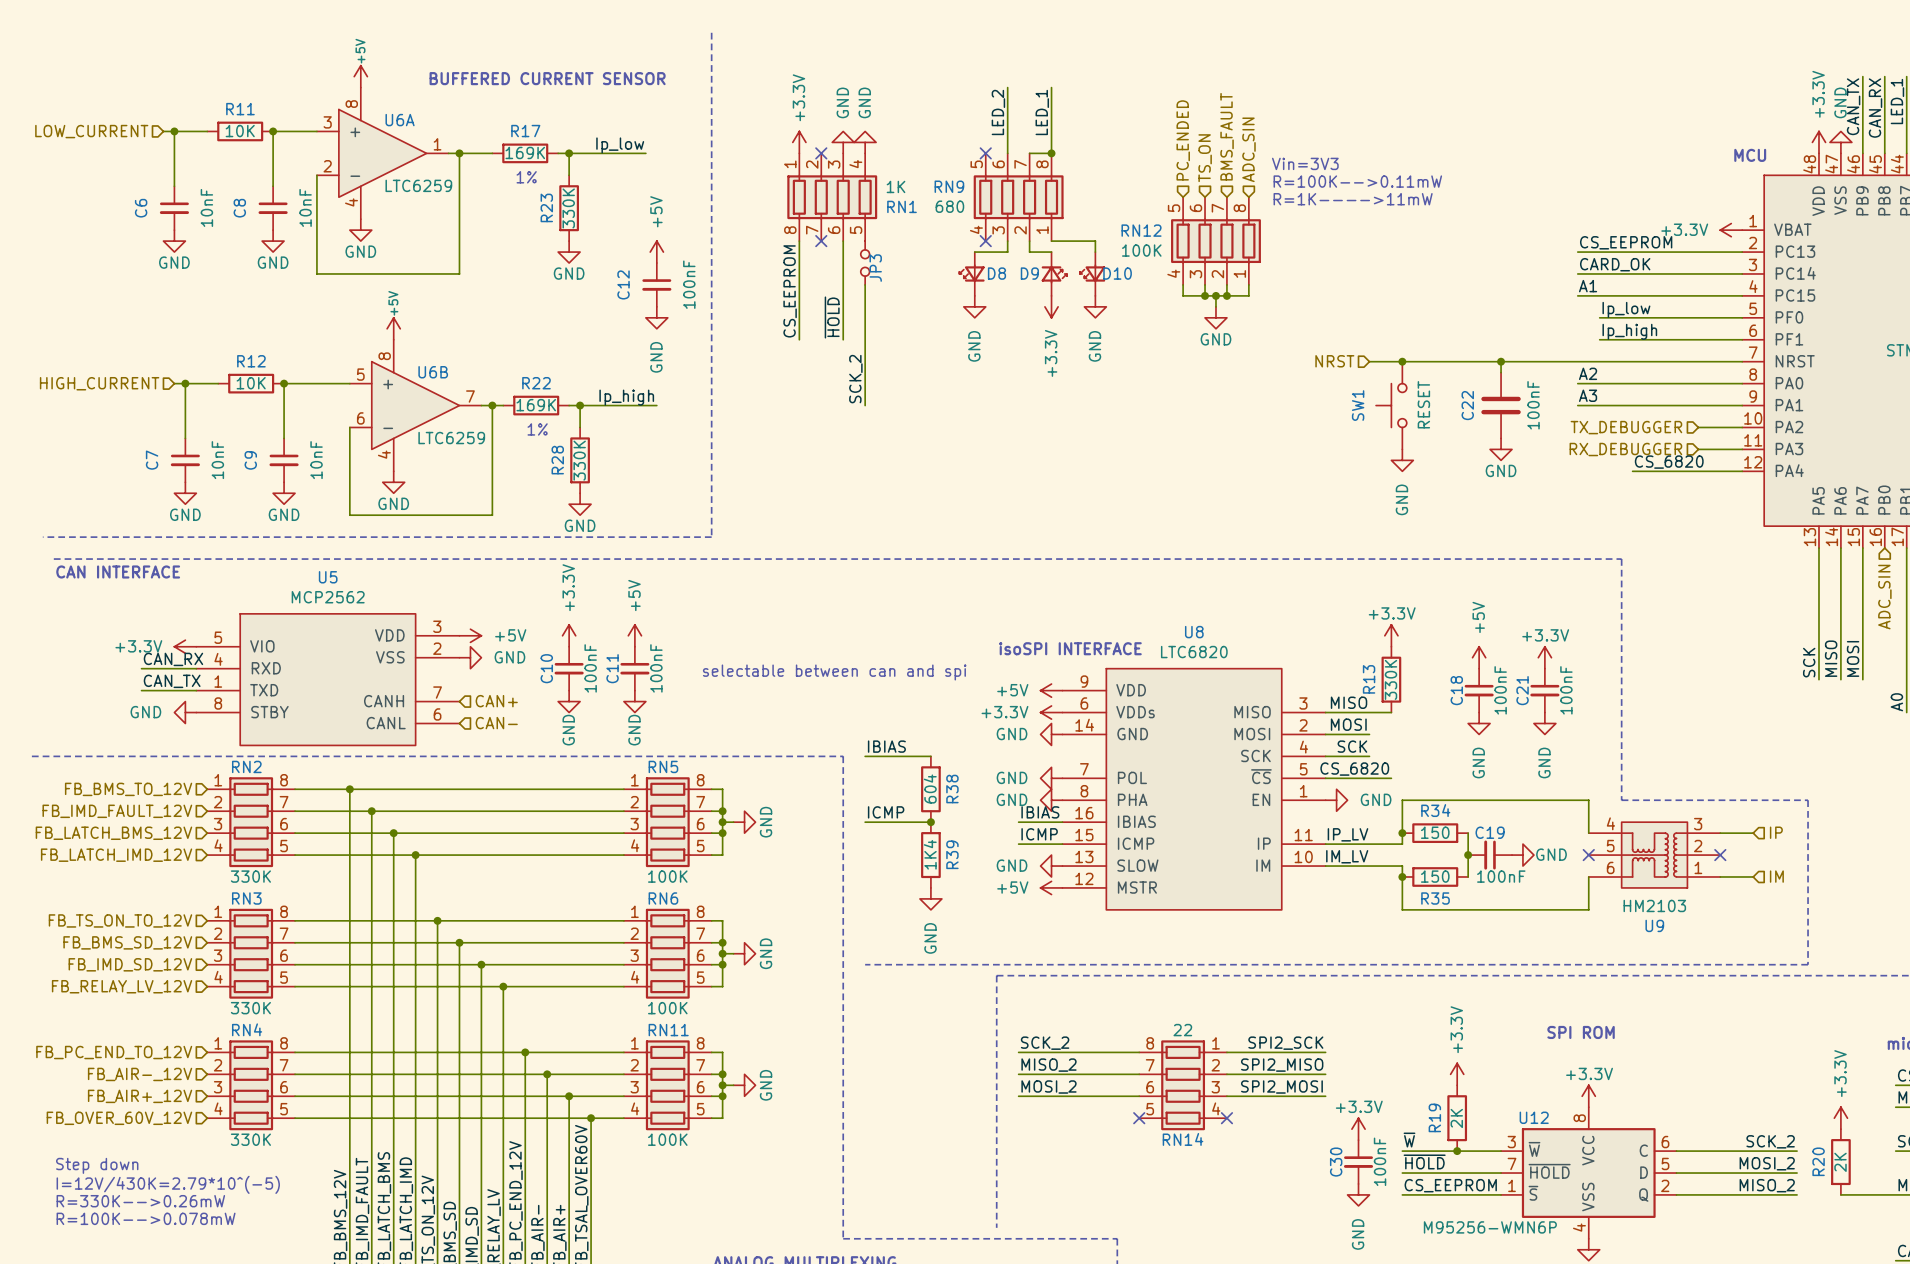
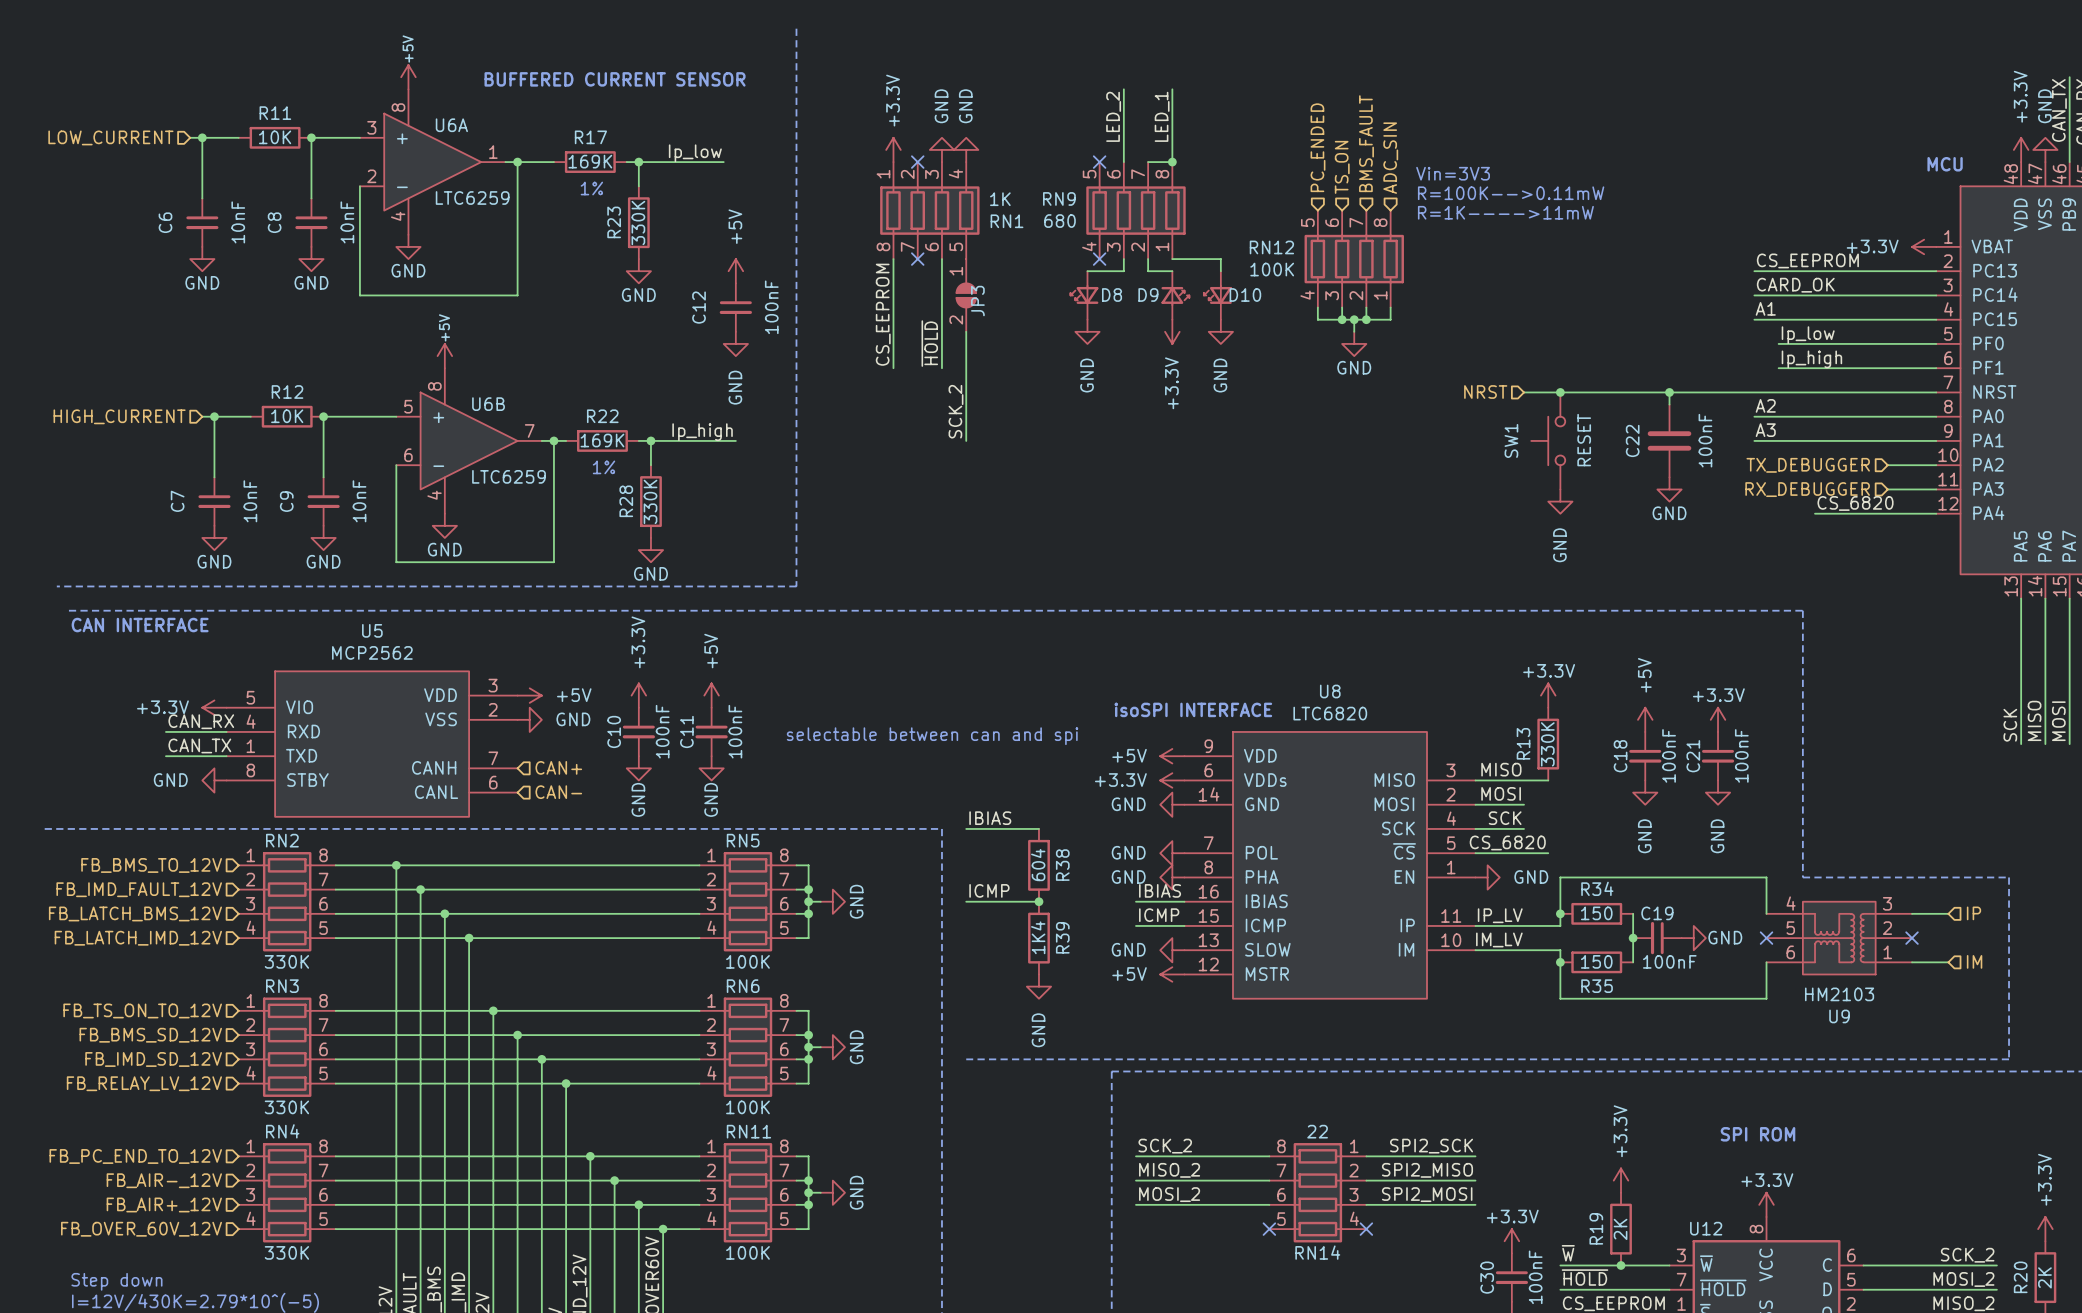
JP3 symbol: [860, 241, 870, 285] -> [956, 259, 976, 332]

